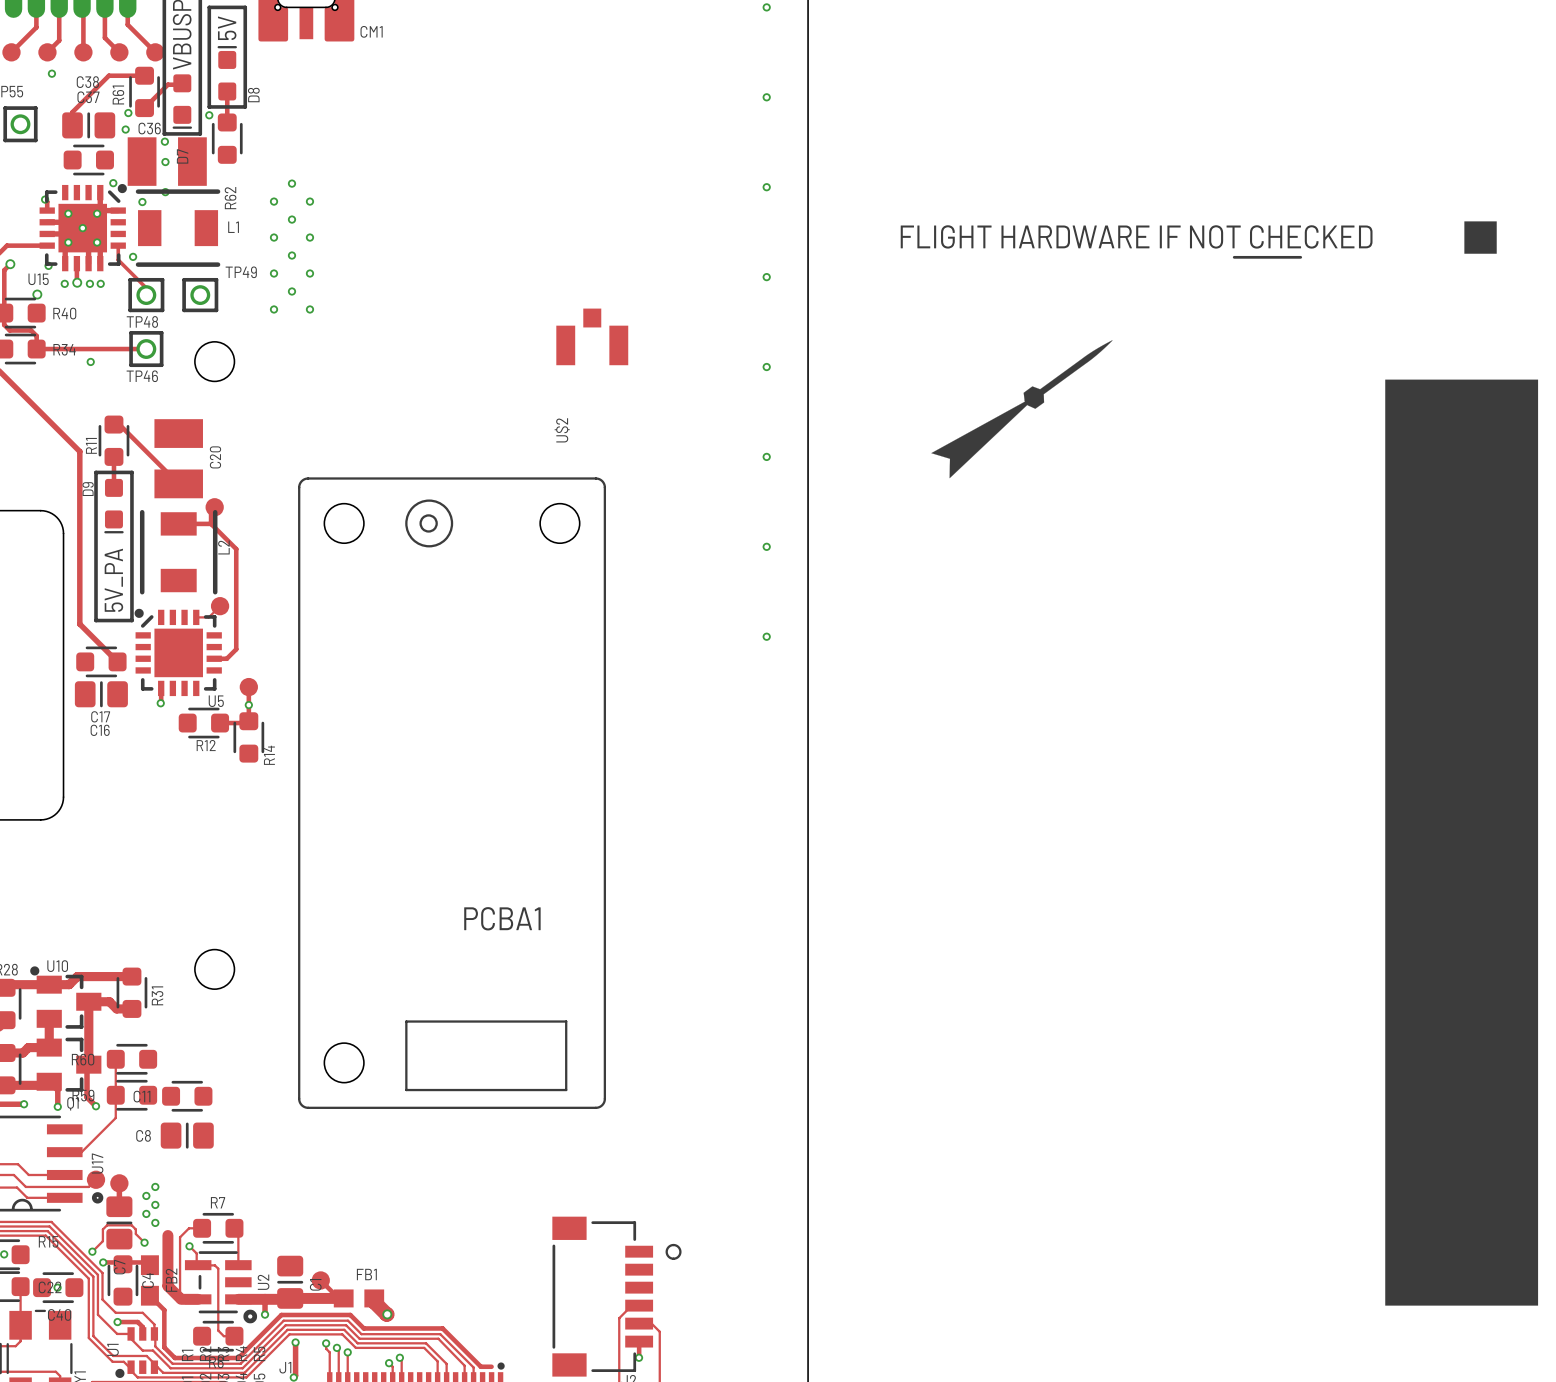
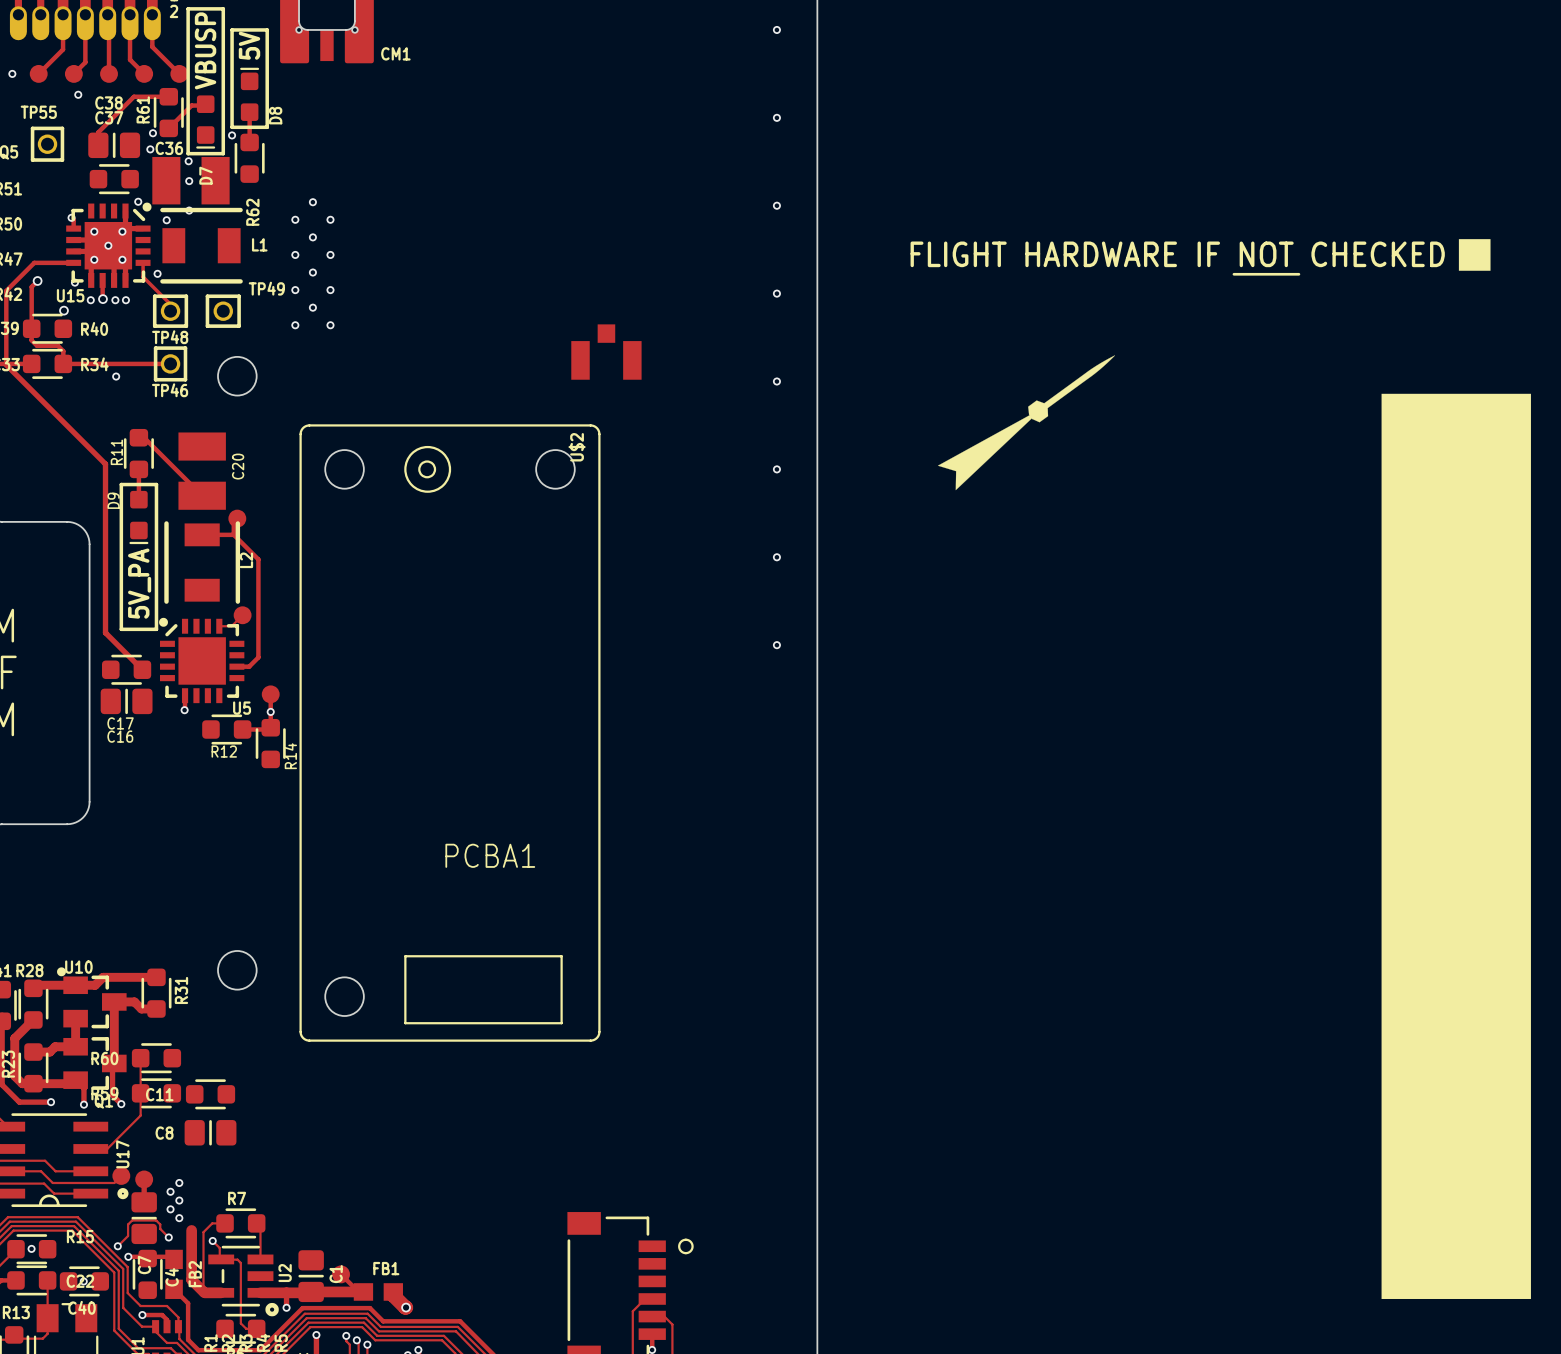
PCBA1 position: (452, 793) -> (450, 733)

